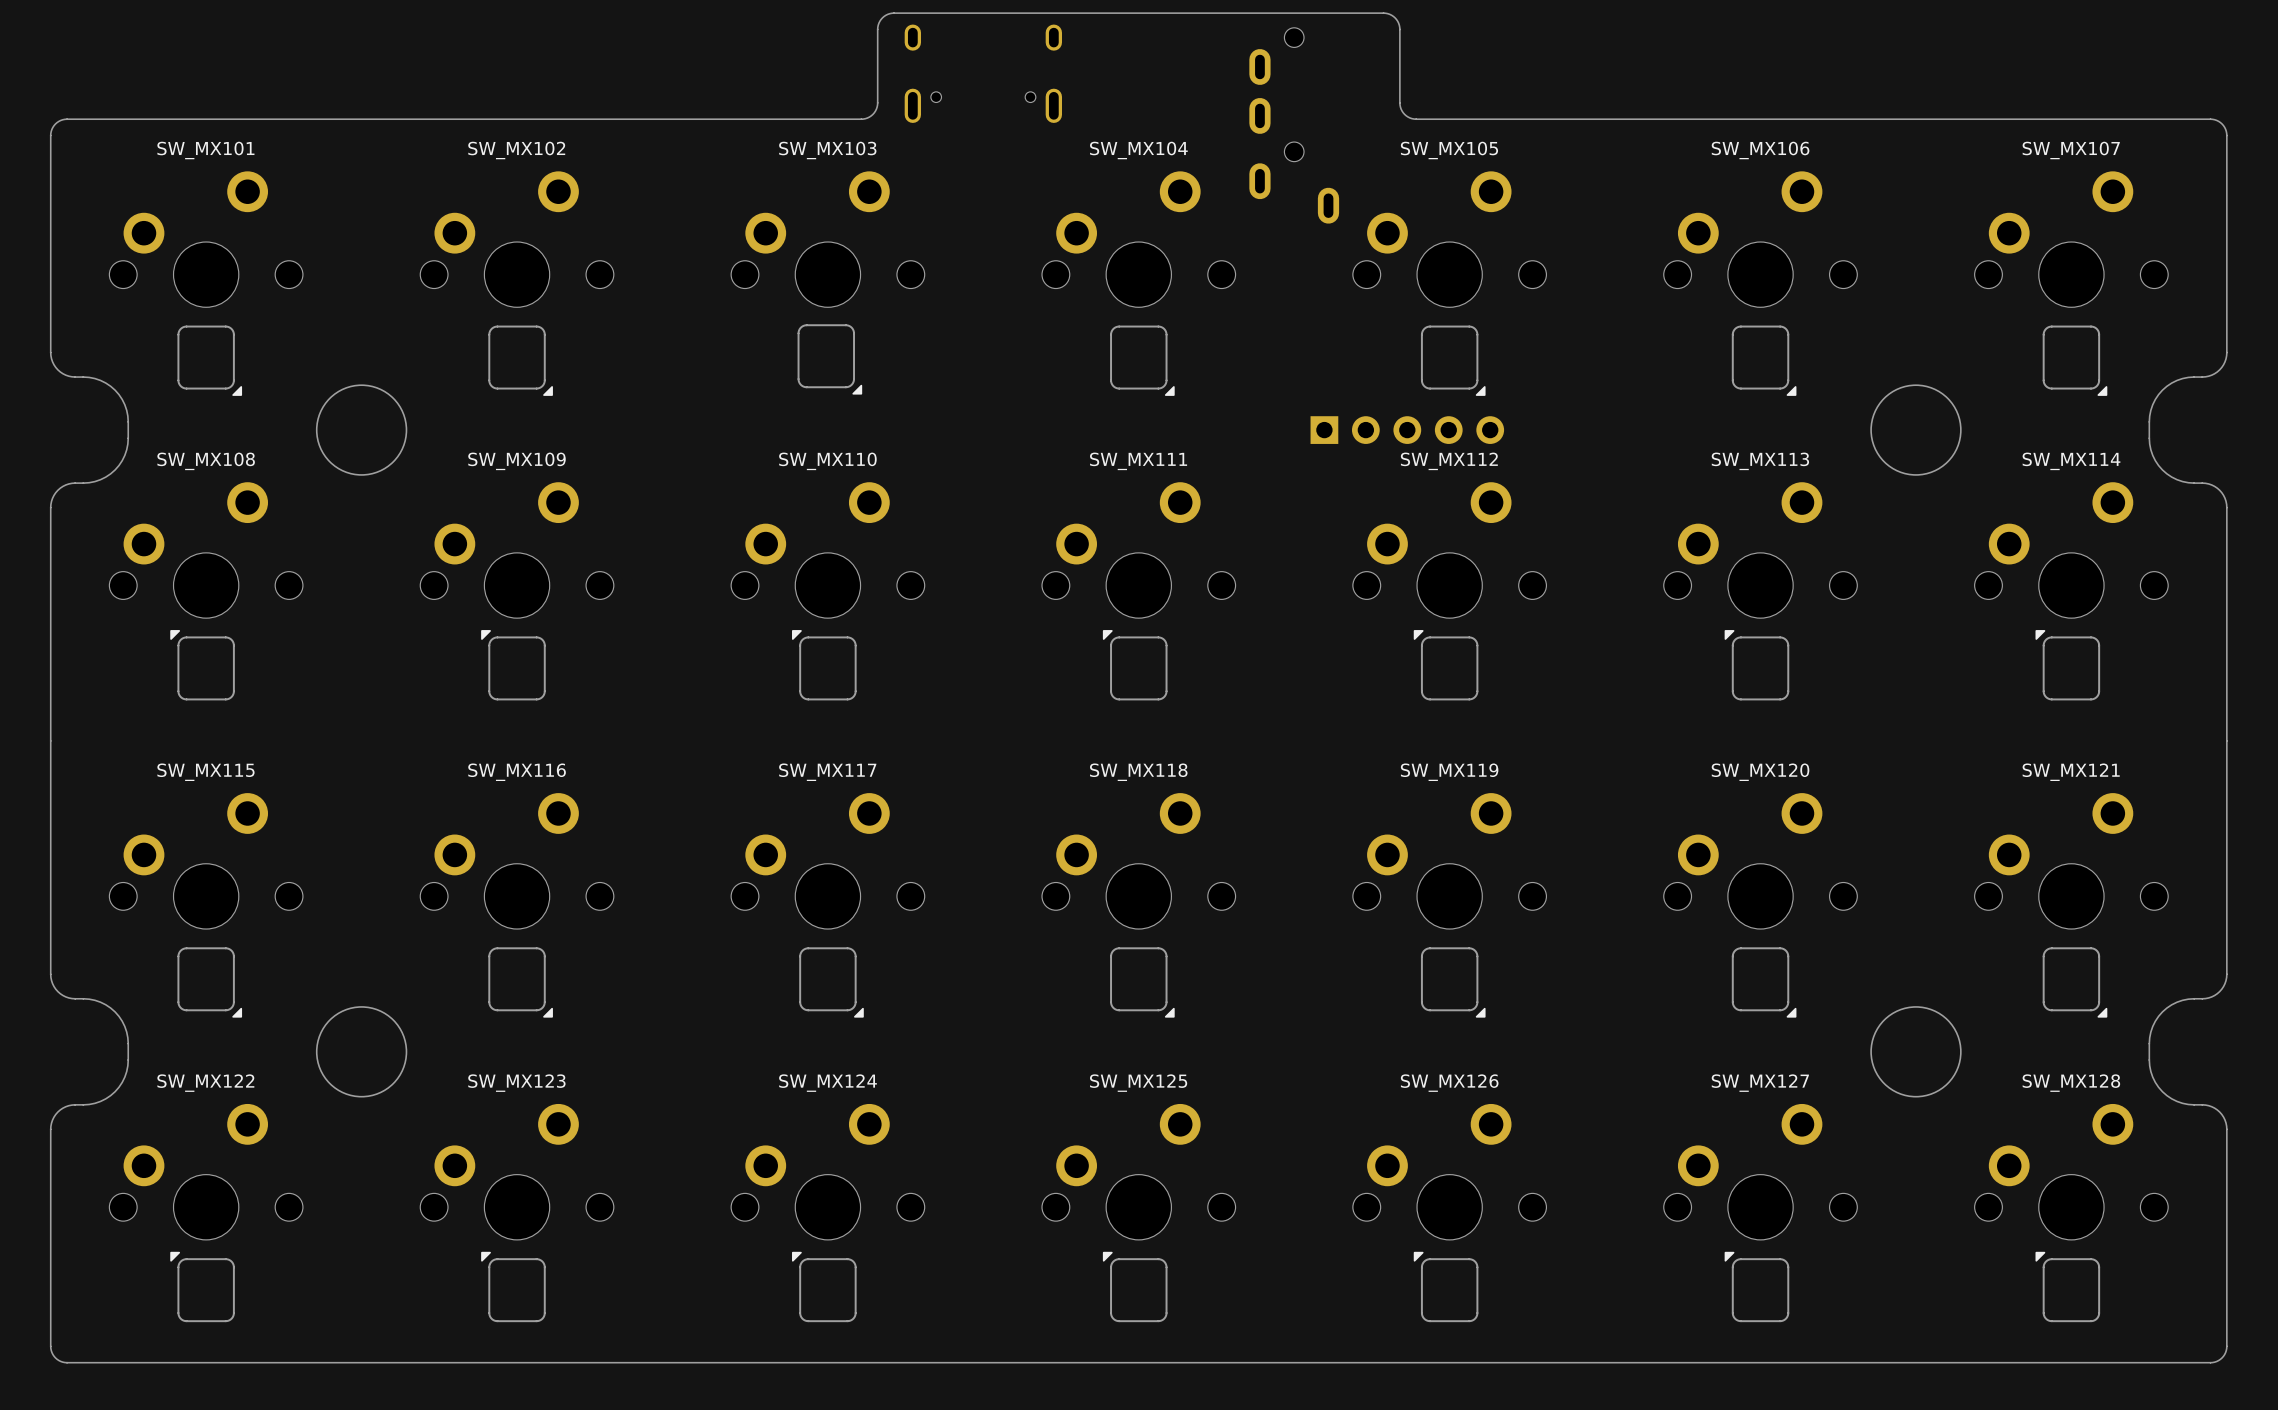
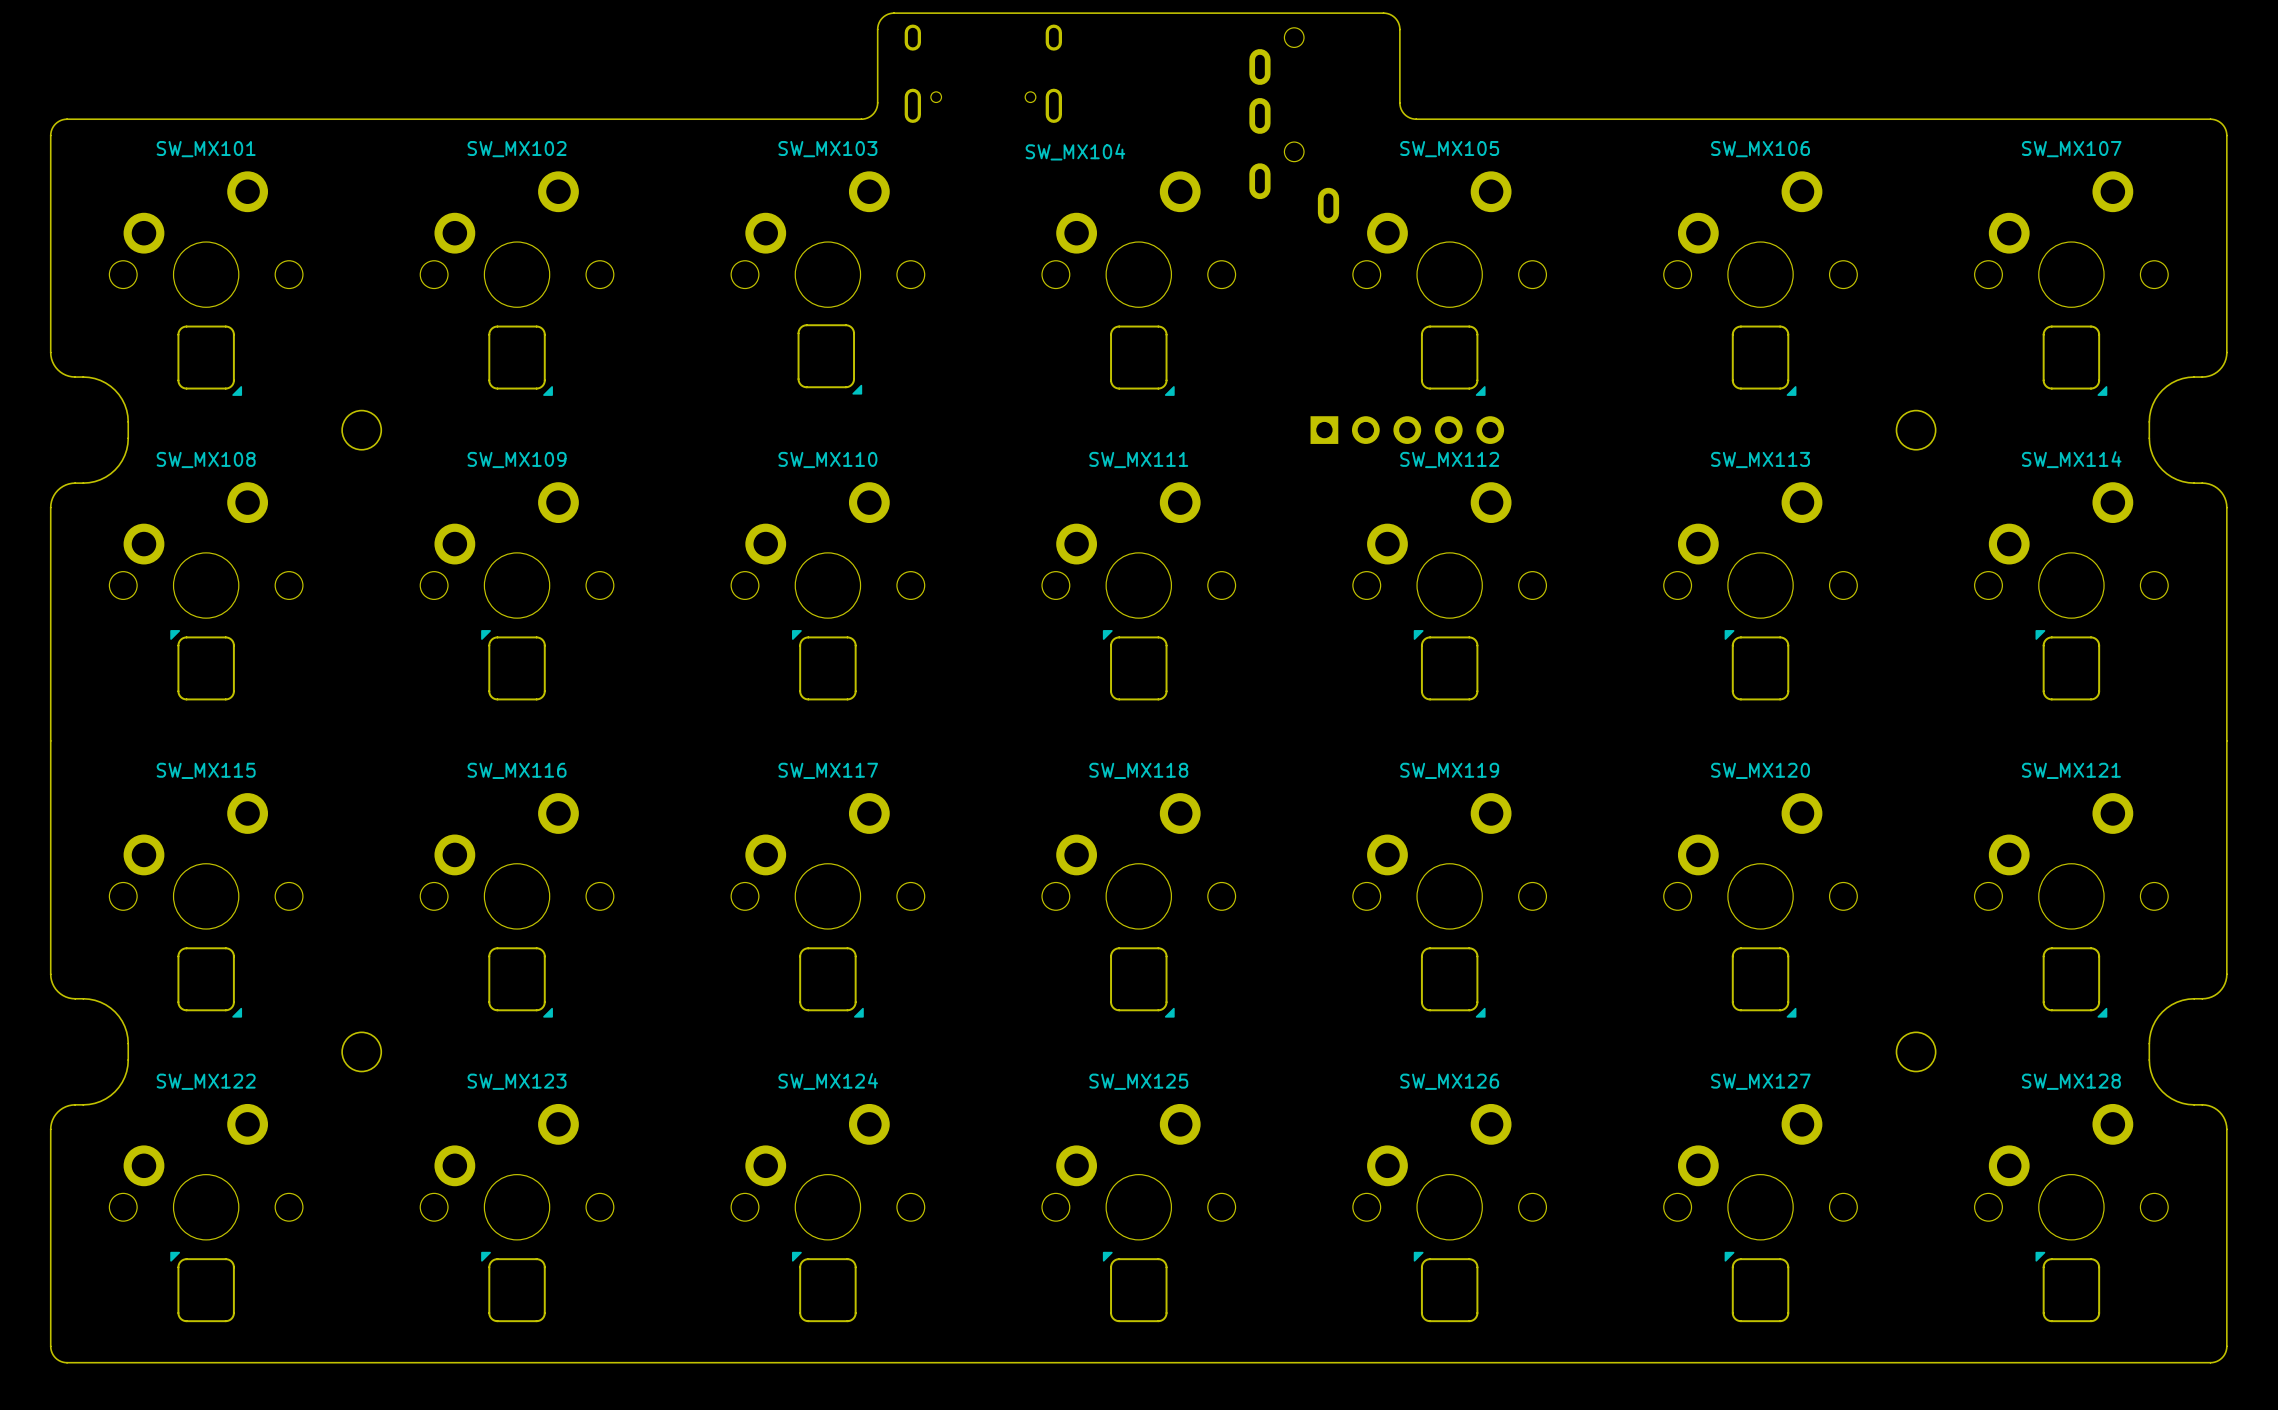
SW_MX104 name position: SW_MX104 (1138, 150) -> SW_MX104 (1075, 152)
round board edge size: [315, 384, 408, 476] -> [341, 409, 383, 451]
round board edge size: [1870, 384, 1962, 476] -> [1895, 409, 1937, 451]
round board edge size: [315, 1006, 408, 1098] -> [341, 1031, 383, 1073]
round board edge size: [1870, 1006, 1962, 1098] -> [1895, 1031, 1937, 1073]

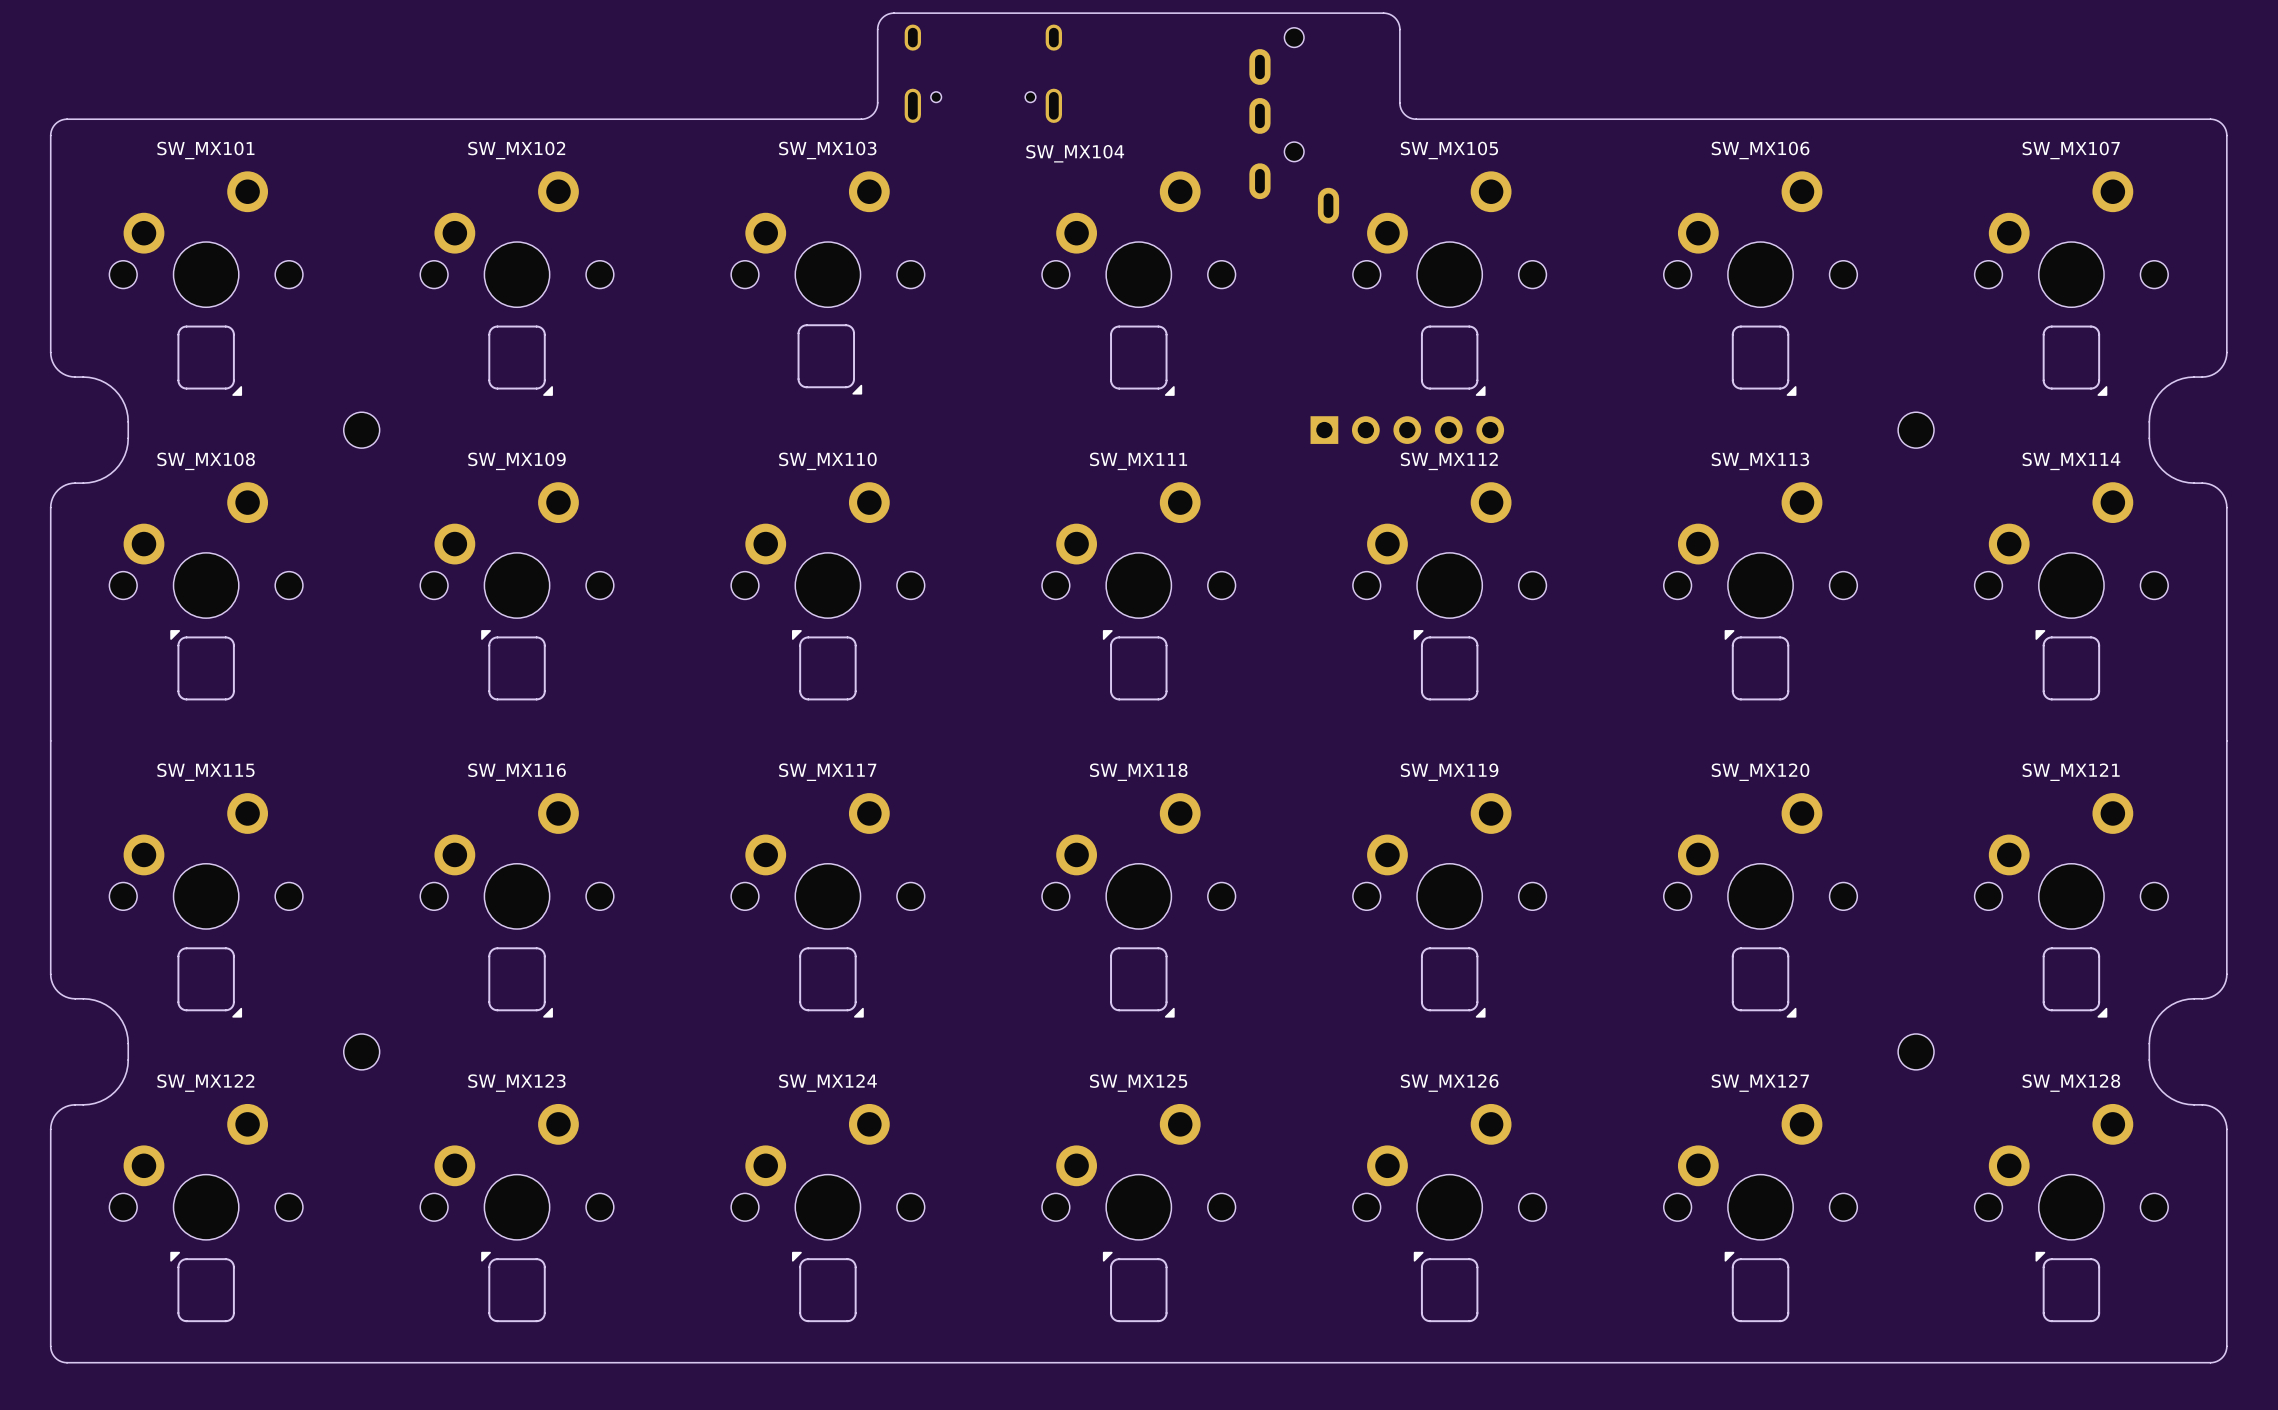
round board edge: [341, 409, 383, 451] -> none
round board edge: [1895, 409, 1937, 451] -> none
part: none -> (361, 430)
part: none -> (1916, 430)
round board edge: [341, 1031, 383, 1073] -> none
round board edge: [1895, 1031, 1937, 1073] -> none
part: none -> (361, 1051)
part: none -> (1916, 1051)

